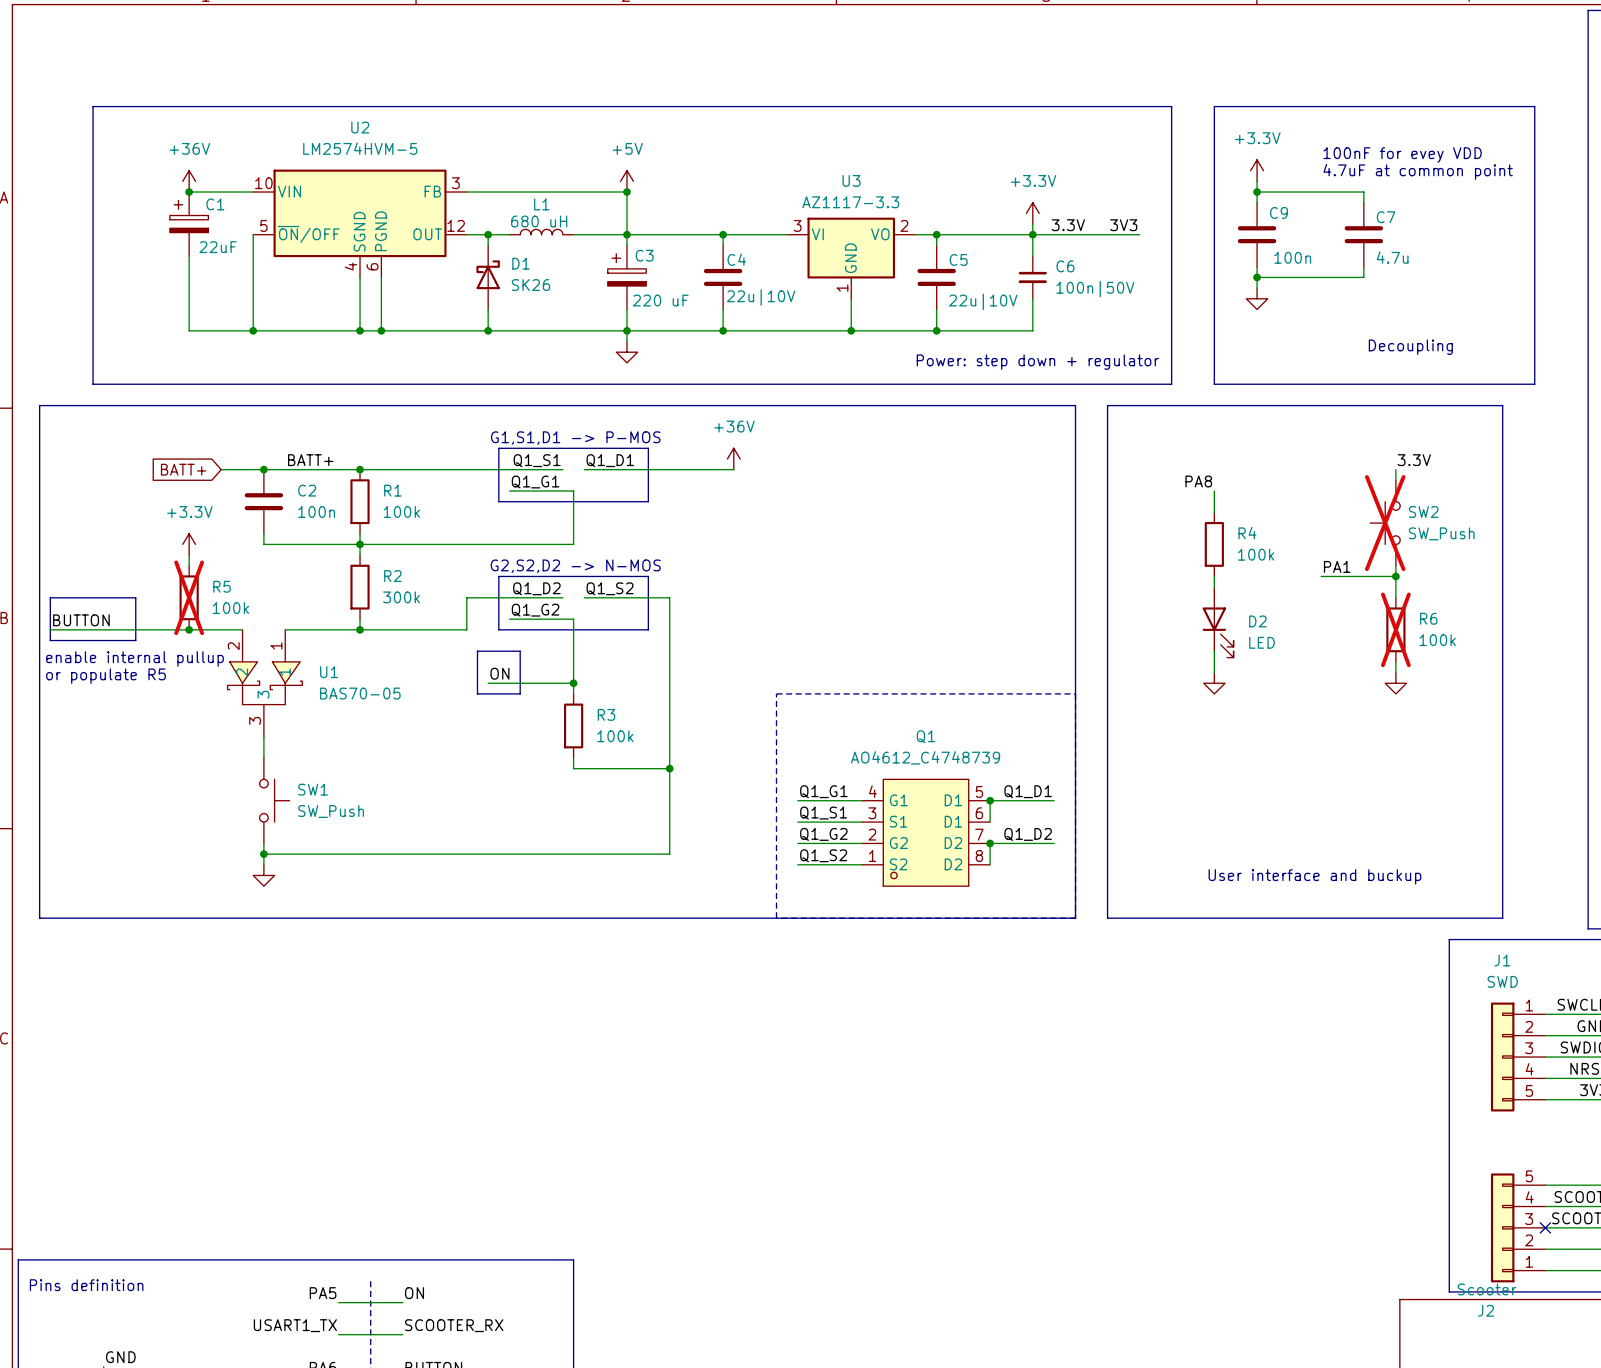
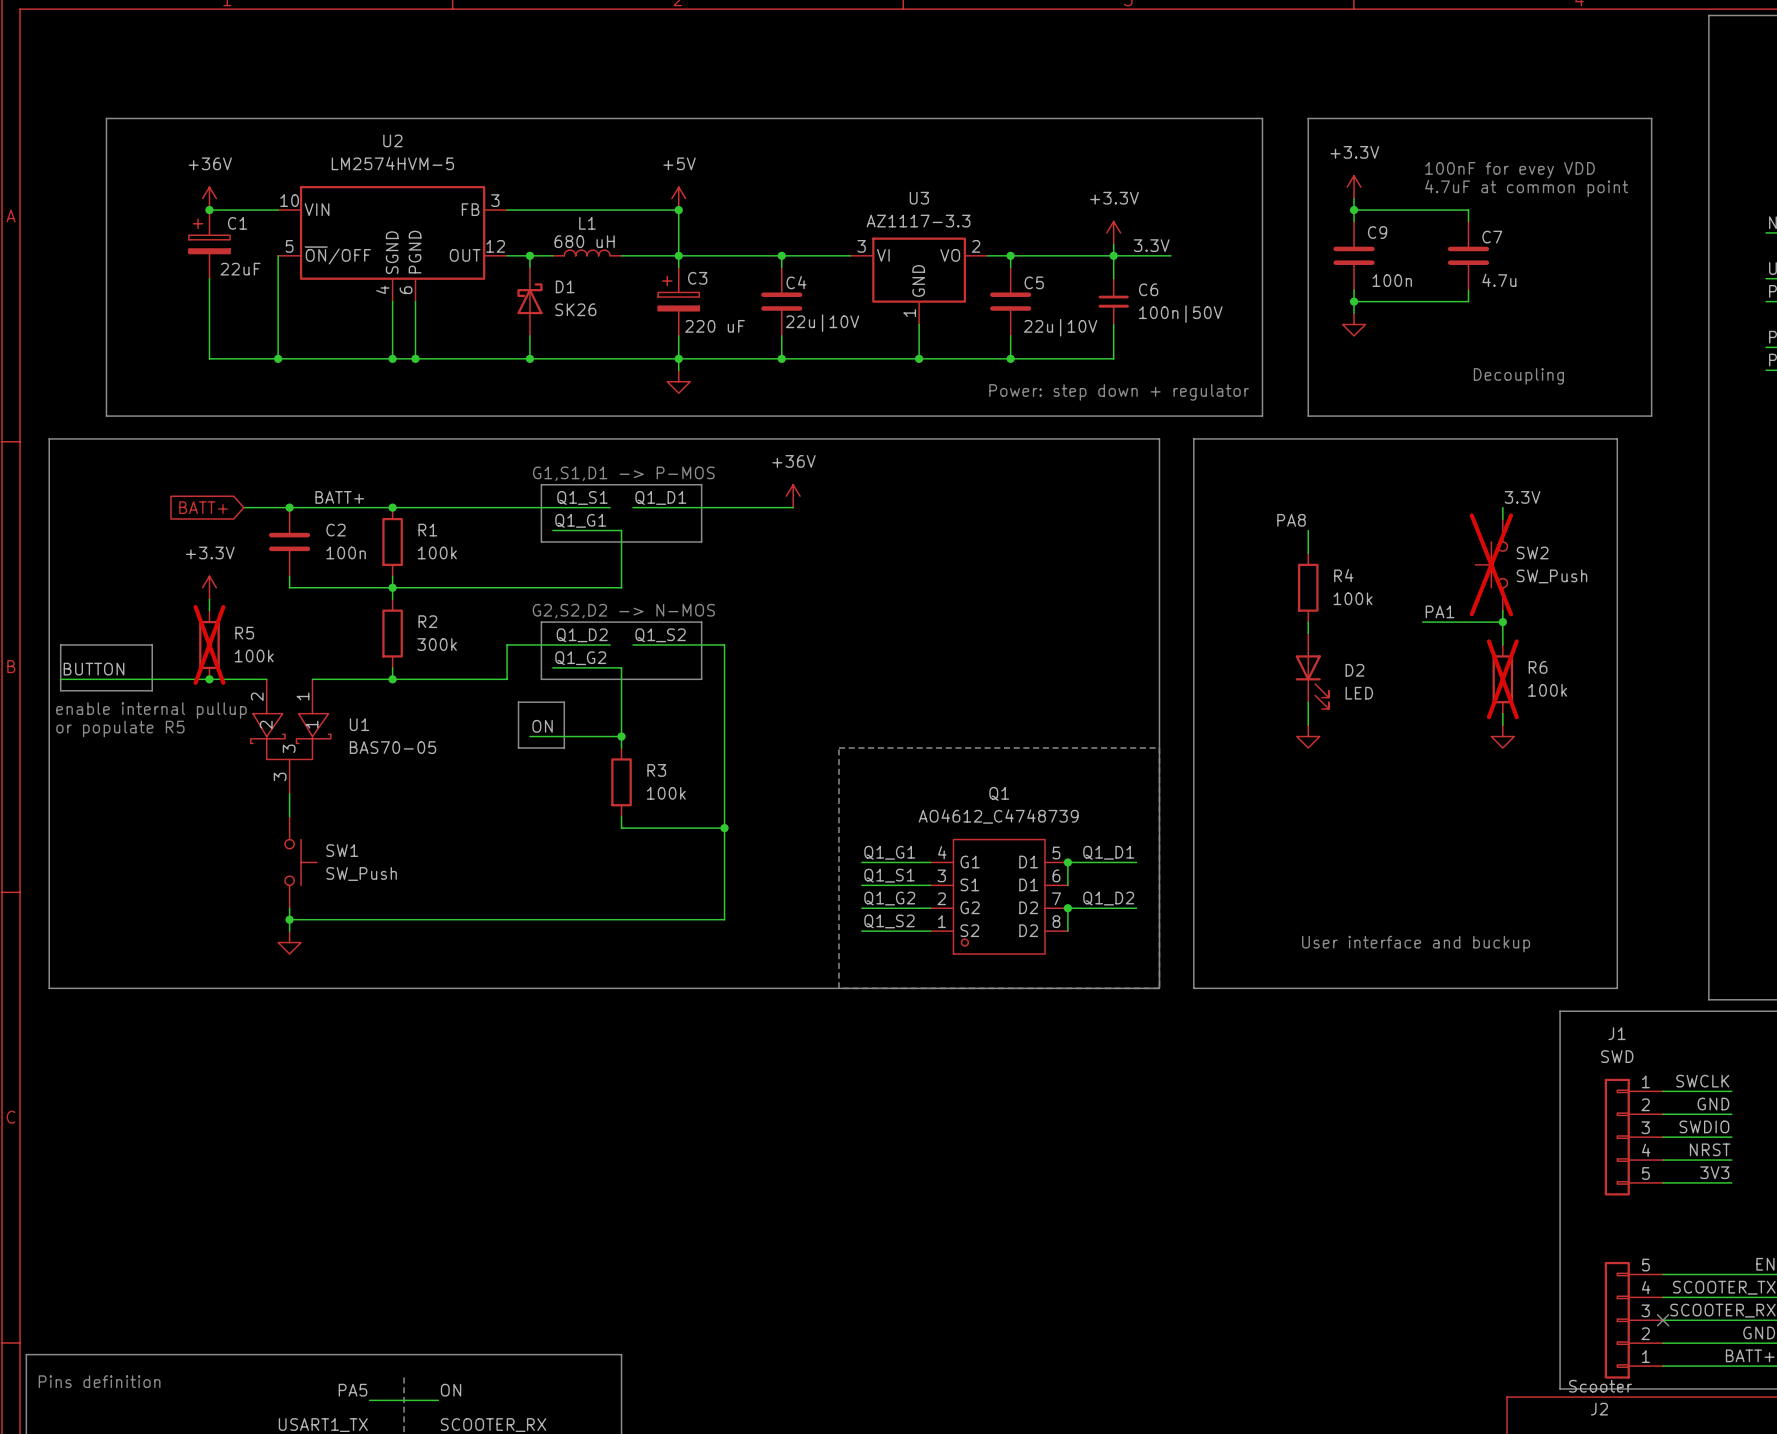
label: 3V3 (1123, 225) -> none
wire: (1086, 234) (1139, 234) -> none

